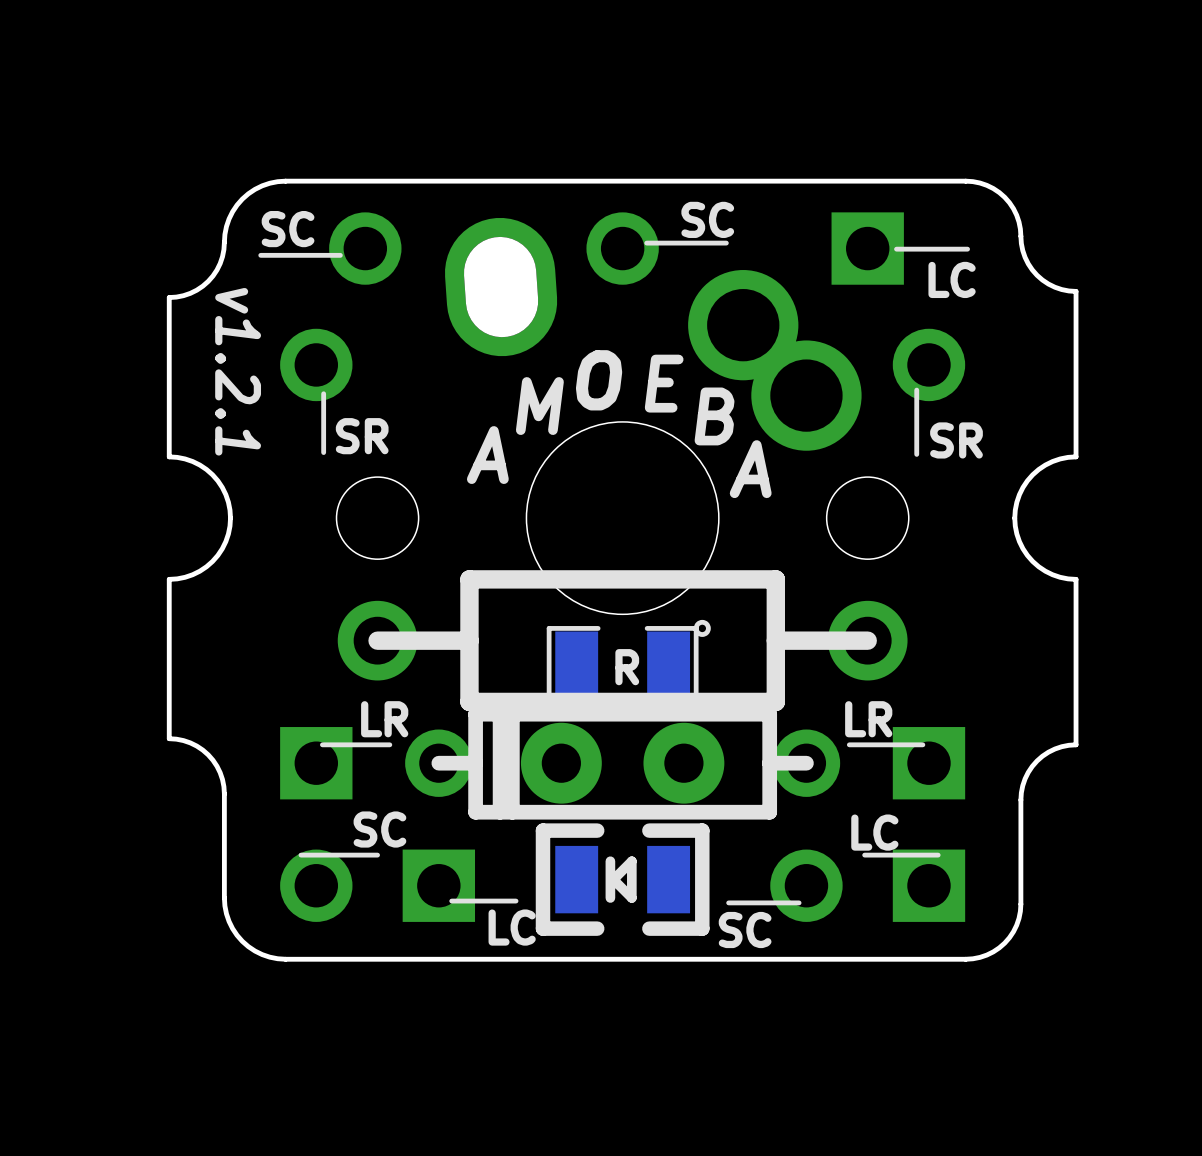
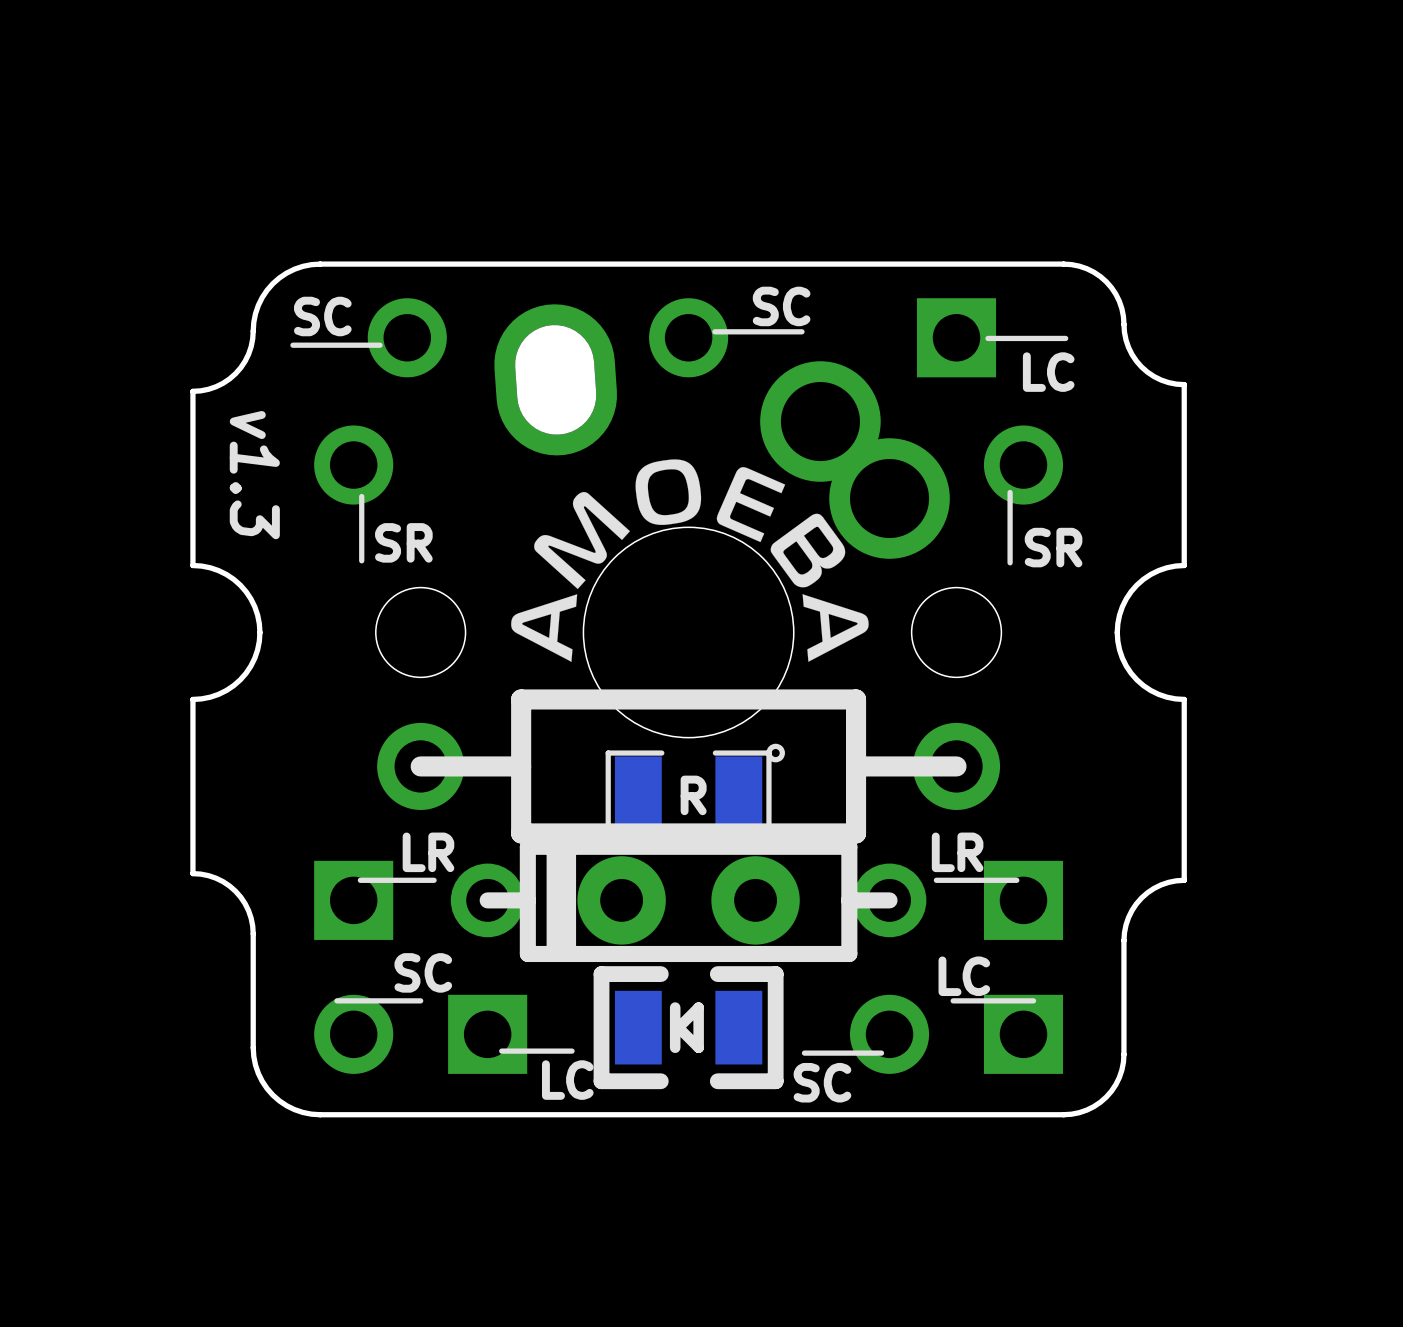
drawing: none -> [511, 459, 869, 662]
text: v1.2.1 (238, 371) -> v1.3 (254, 475)
text: O (599, 380) -> none
text: E (664, 383) -> none
text: M (539, 406) -> none
text: B (714, 416) -> none
text: A (487, 455) -> none
text: A (750, 469) -> none

